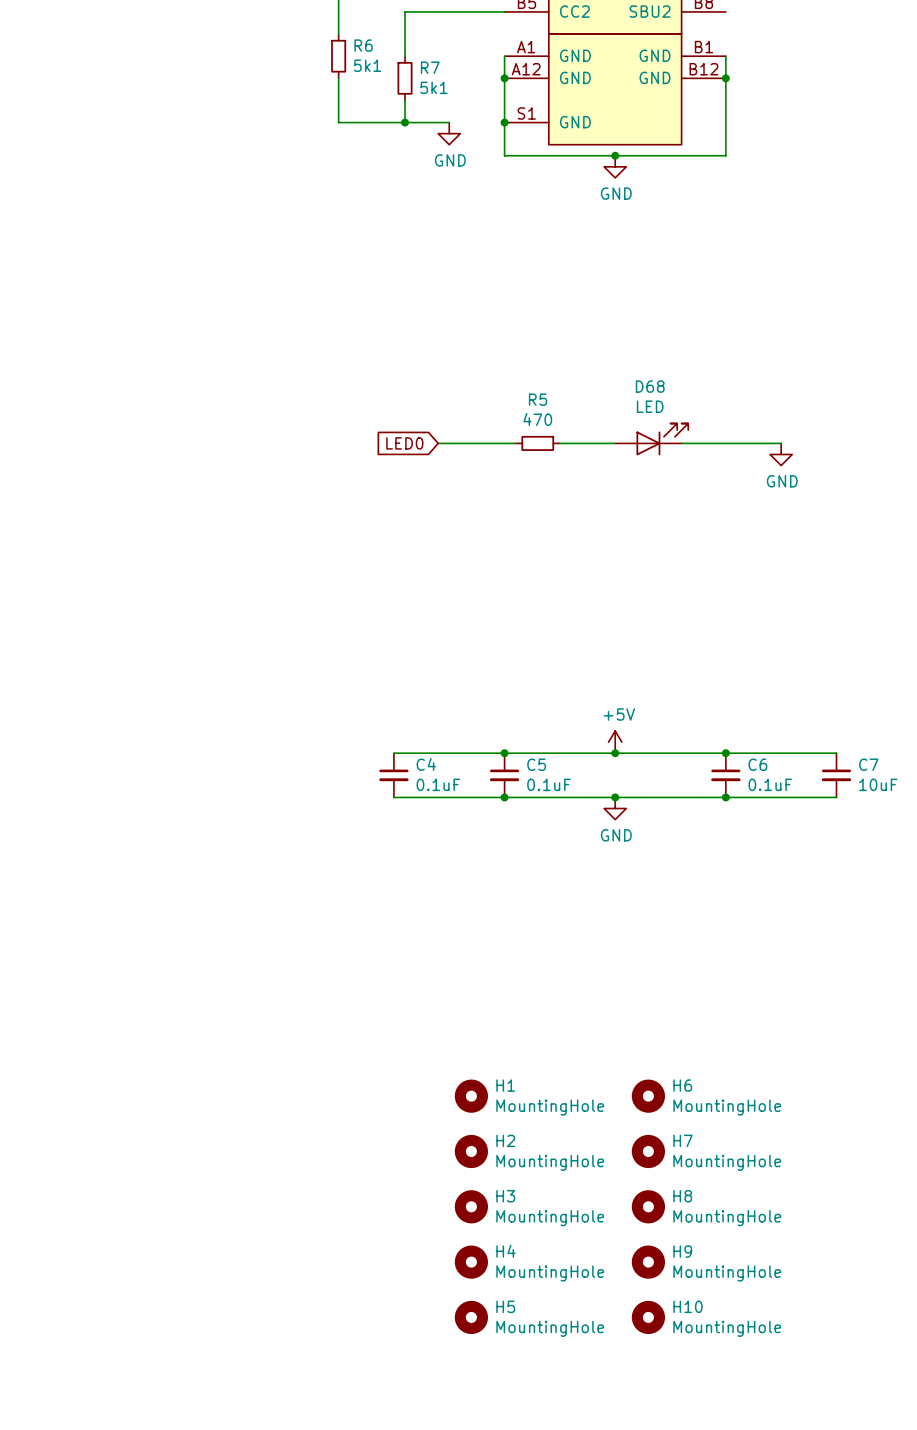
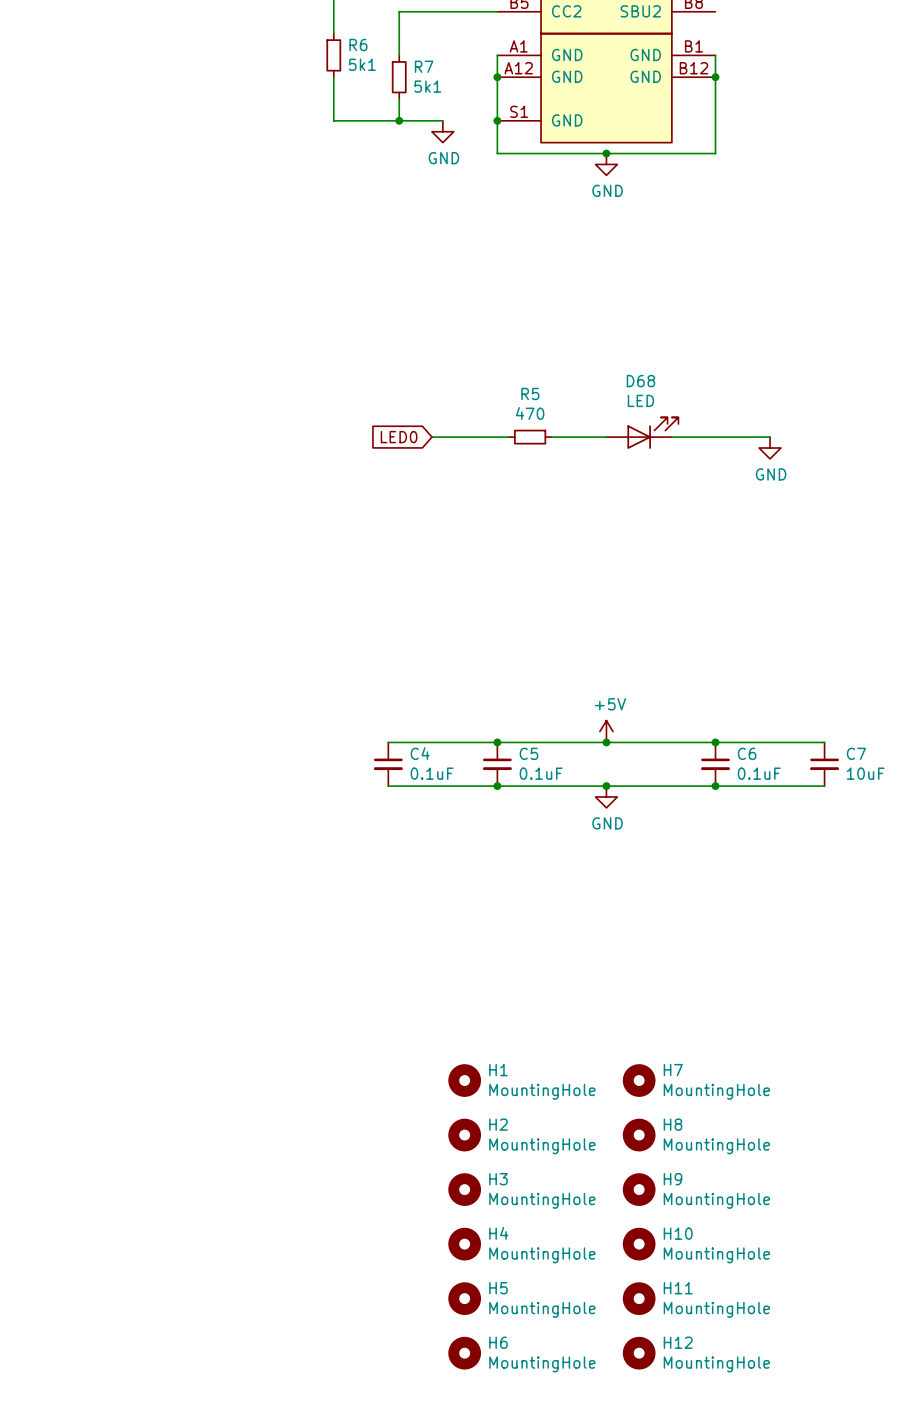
H6 name: H6 (682, 1085) -> H7 (673, 1070)
H7 name: H7 (683, 1140) -> H8 (673, 1124)
H8 name: H8 (682, 1196) -> H9 (673, 1179)
H9 name: H9 (682, 1251) -> H10 (678, 1233)
H10 name: H10 (688, 1306) -> H11 (678, 1288)
H6: none -> MountingHole (464, 1353)
H12: none -> MountingHole (639, 1353)

